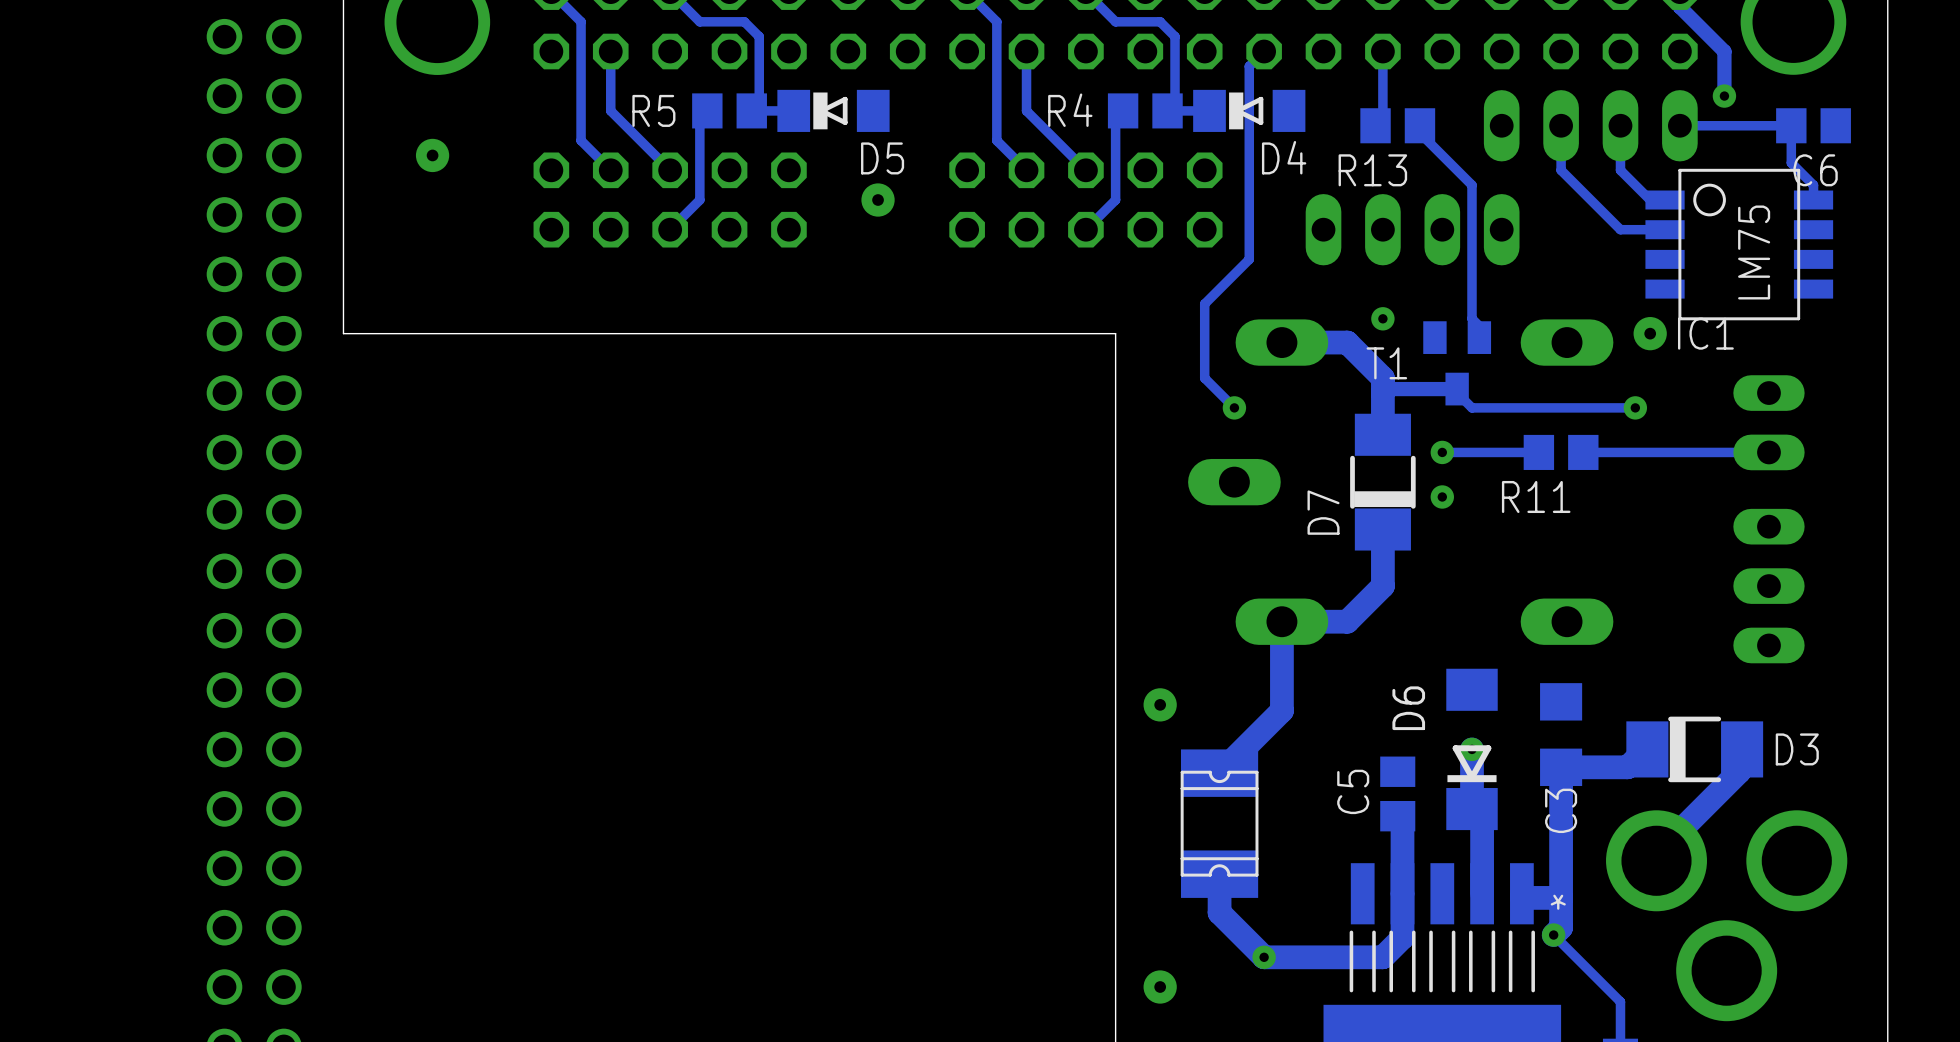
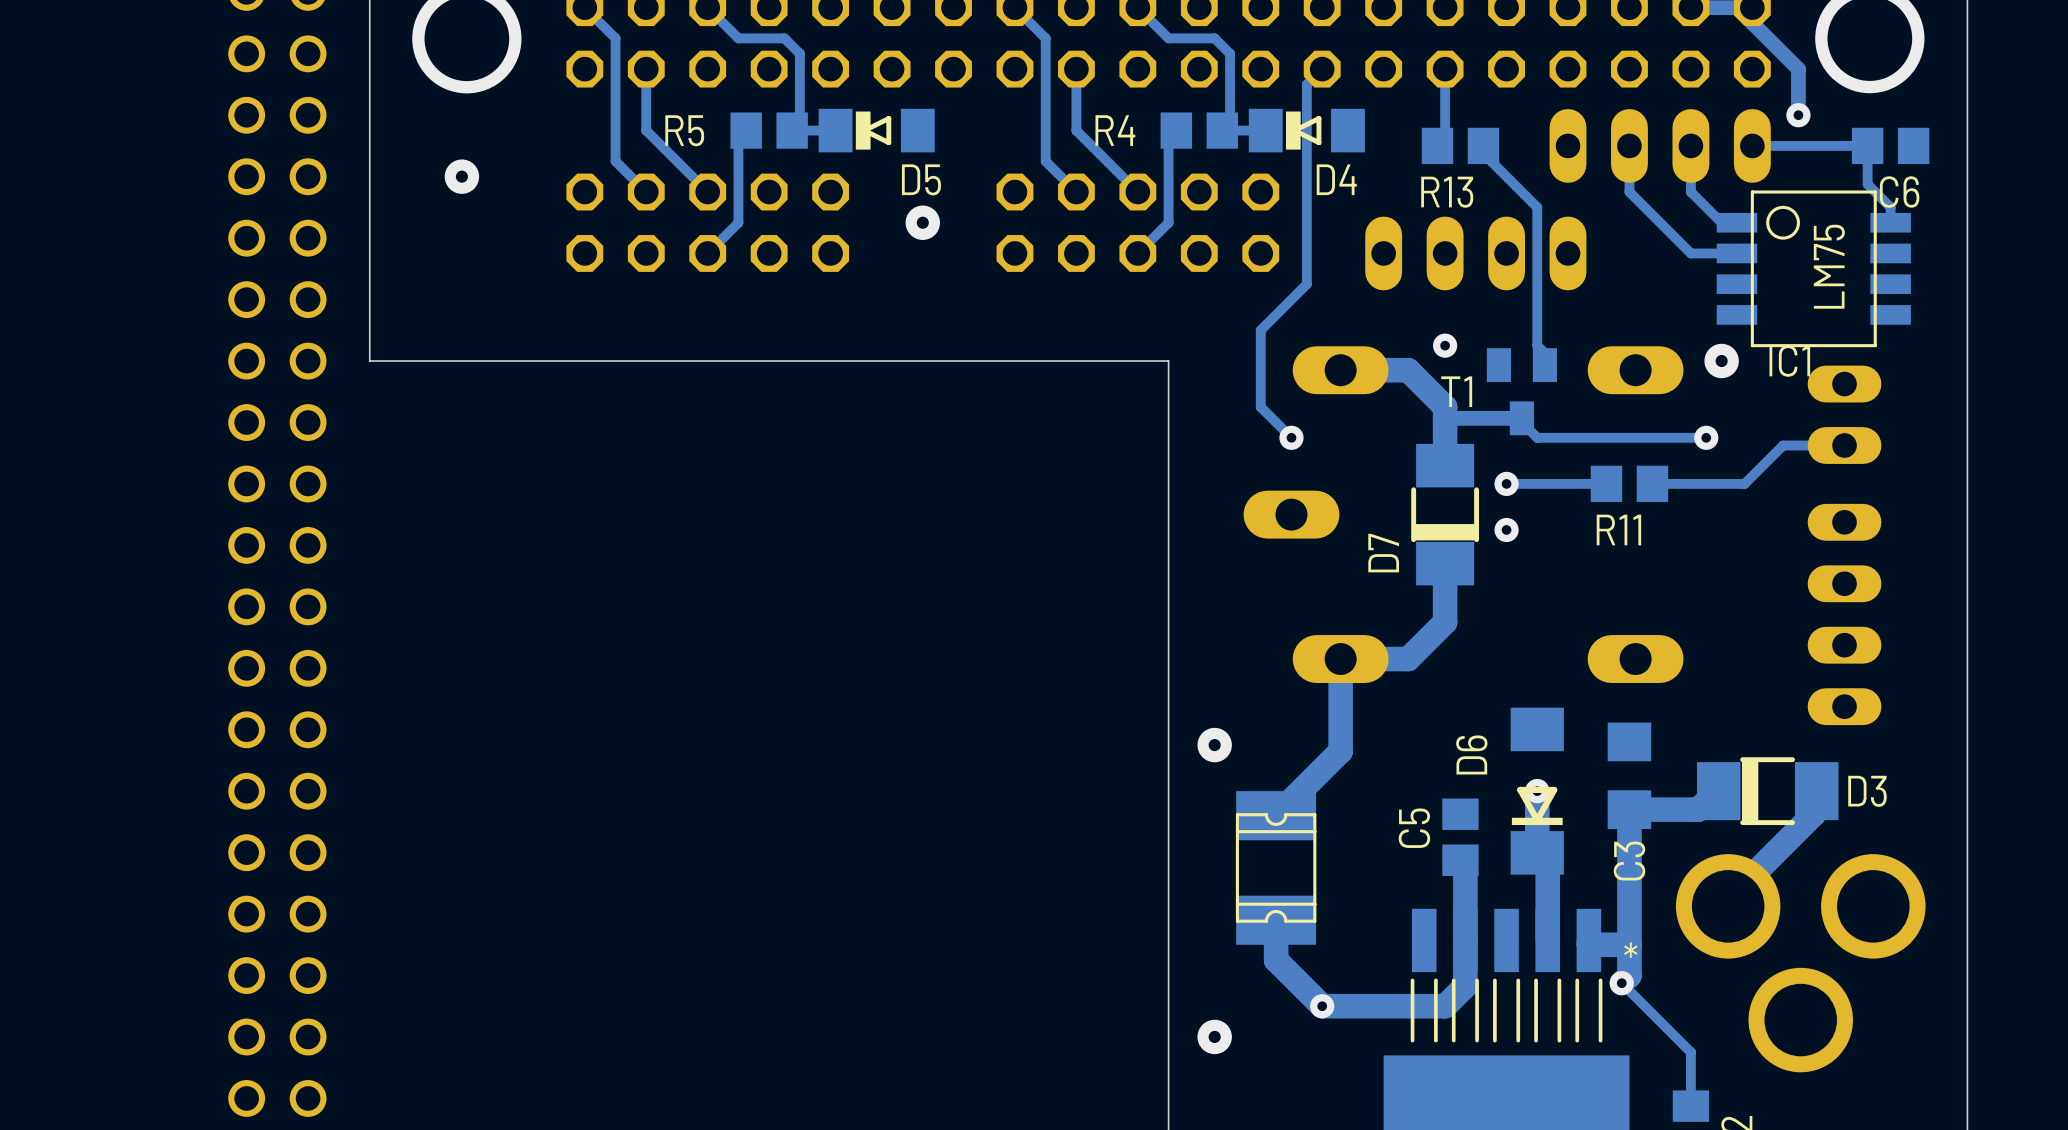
part position: (1768, 422) -> (1844, 414)
track: (1768, 452) (1672, 452) -> (1844, 445) (1783, 445) (1744, 483)
part footprint: [1733, 508, 1805, 664] -> [1807, 503, 1882, 726]

